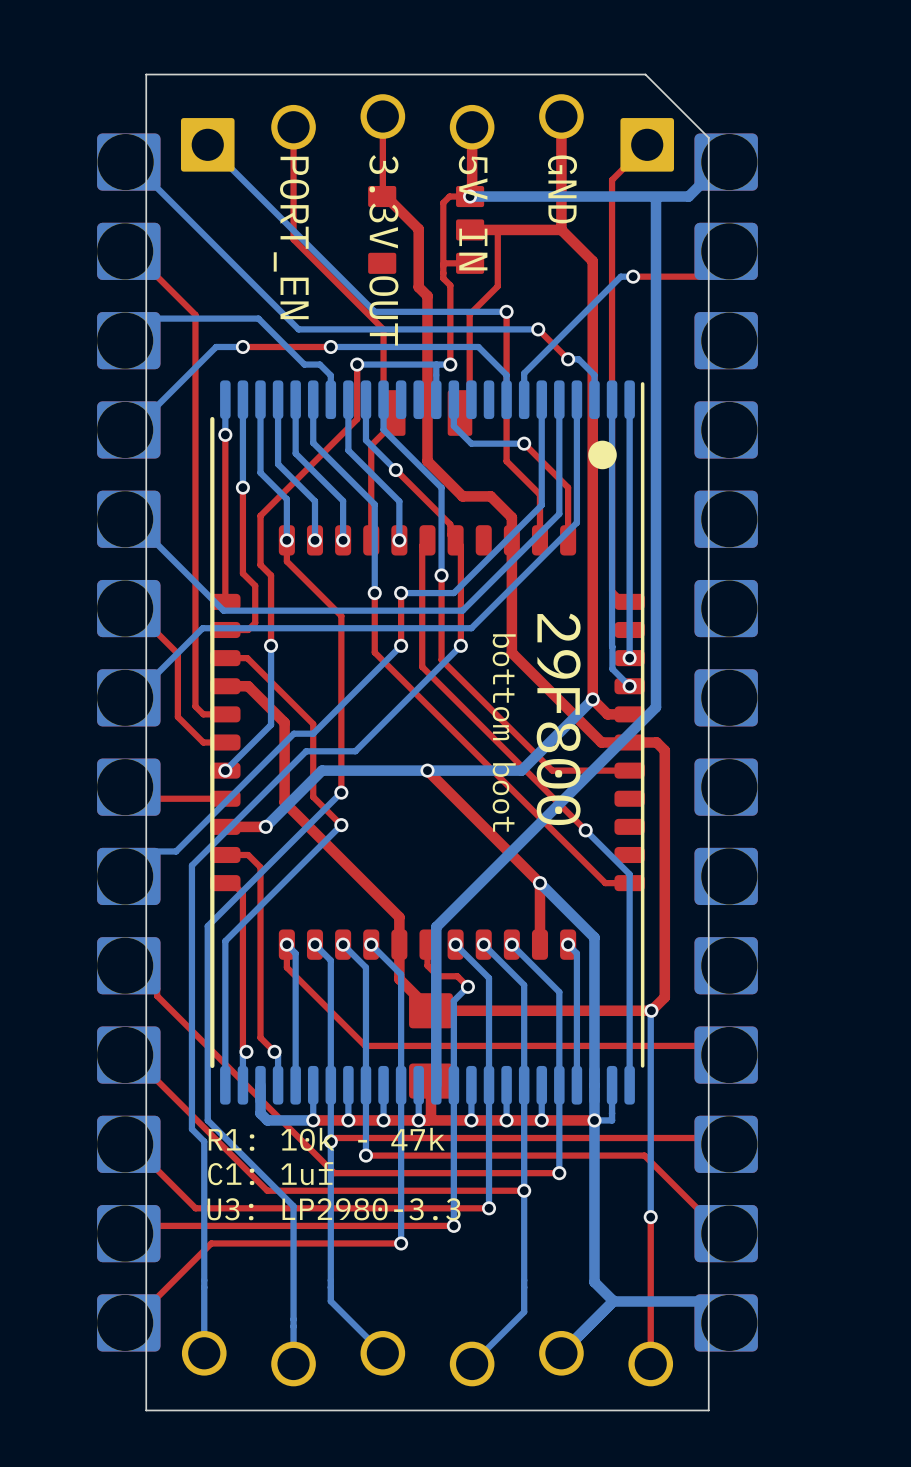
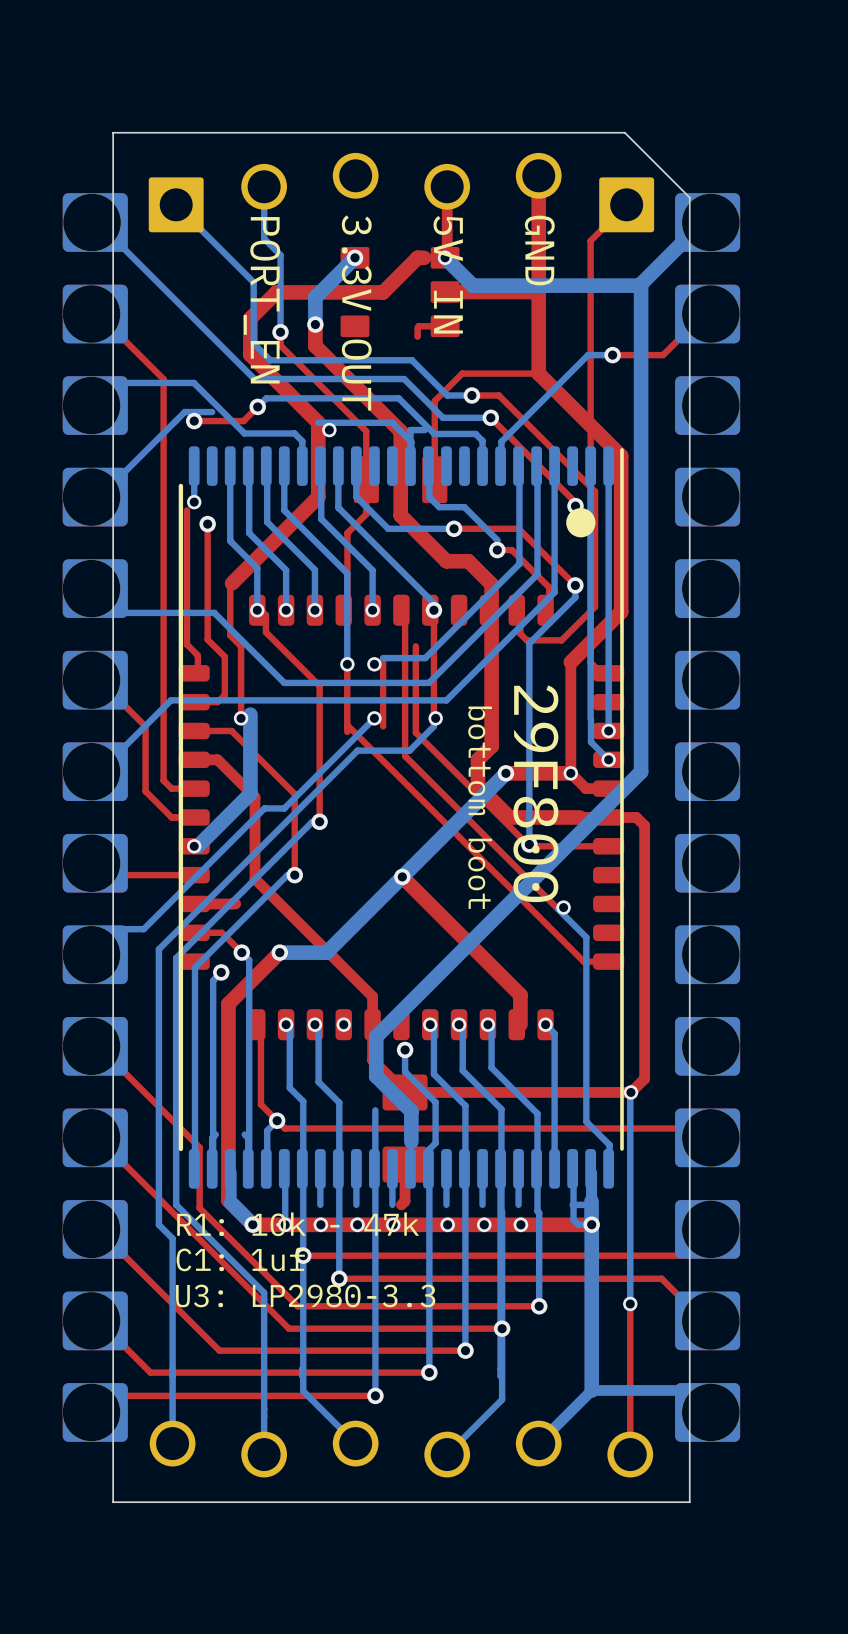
top track: (382, 116) (382, 196) (386, 196) (418, 229) (418, 287) (427, 296) (427, 461) (462, 496) (490, 496) (511, 517) (511, 652) (601, 742) -> (315, 324) (315, 346) (400, 431) (400, 515) (446, 561) (468, 561) (491, 584) (491, 746) (478, 759) (478, 785) (509, 817) (579, 817)
top track width: thin (561, 116) (561, 229) (470, 229) (497, 229) -> thick (538, 175) (538, 292) (445, 292) (473, 292)
bottom track: none -> (264, 185) (264, 238) (280, 255) (280, 332)
top track: (293, 127) (293, 239) (383, 329) (383, 403) (393, 412) -> (280, 332) (280, 345) (366, 431) (366, 479)
bottom track: (723, 162) (688, 196) (470, 196) -> (641, 285) (472, 285) (445, 257)
bottom track: none -> (704, 222) (641, 284) (641, 771) (376, 1036) (376, 1076) (411, 1111) (411, 1141)
bottom track: none -> (355, 257) (315, 297) (315, 324)
via: none -> (355, 257)
top track: (449, 196) (443, 202) (443, 266) -> (424, 257) (417, 257) (383, 292) (276, 292) (250, 318) (250, 354) (318, 422) (318, 497)
bottom track: (656, 197) (656, 707) (436, 927) (436, 1085) -> none
bottom track: (283, 220) (374, 311) (506, 311) -> (253, 282) (253, 343) (270, 360) (411, 360) (447, 395) (471, 395)
top track: (497, 229) (497, 286) (469, 314) (469, 403) (460, 412) -> (538, 373) (462, 373) (434, 401) (434, 479)
top track: (561, 229) (592, 261) (592, 591) -> (538, 373) (621, 456) (621, 611) (570, 662)
top track: none -> (538, 292) (538, 373)
top track: (729, 251) (704, 276) (633, 276) -> (711, 314) (704, 314) (663, 355) (612, 355)
via: none -> (315, 324)
via: none -> (280, 332)
top track: (443, 273) (443, 278) (450, 285) (450, 364) -> none
bottom track: (633, 276) (620, 276) (524, 373) (524, 399) -> none
via position: (633, 276) -> (612, 355)
bottom track: none -> (612, 355) (588, 355) (501, 441) (501, 469)
top track: (506, 311) (506, 461) (539, 494) (539, 540) -> none
via: (506, 311) -> none
bottom track: (283, 314) (298, 329) (538, 329) -> (254, 379) (404, 379) (442, 417) (490, 417)
bottom track: (225, 318) (258, 318) (304, 364) (319, 364) (323, 367) -> (193, 382) (244, 433) (294, 433)
top track: (538, 329) (568, 359) -> none
via: (538, 329) -> none
top track: none -> (471, 395) (498, 395) (595, 491) (595, 606) (561, 640) (526, 640) (520, 633) (520, 610)
via: none -> (471, 395)
top track: none -> (257, 406) (243, 421) (194, 421)
via: none -> (257, 406)
via: (242, 346) -> none
bottom track: (330, 346) (478, 346) (499, 368) -> (257, 406) (266, 398) (398, 398) (434, 433) (475, 433)
top track: (330, 346) (242, 346) -> none
via: (330, 346) -> none
top track: none -> (490, 417) (575, 502) (575, 506)
via: none -> (490, 417)
via: none -> (194, 421)
bottom track: none -> (318, 422) (392, 422) (411, 441) (411, 469)
bottom track: (568, 359) (578, 359) (594, 375) (594, 399) -> none
via: (568, 359) -> none
top track: (357, 364) (357, 419) (346, 429) -> none
bottom track: (436, 364) (357, 364) -> none
via: (450, 364) -> none
bottom track: (242, 399) (242, 487) -> none
bottom track: (278, 399) (278, 465) -> (249, 482) (249, 533)
bottom track: (295, 399) (296, 454) -> (267, 482) (267, 522)
bottom track: (348, 399) (349, 451) -> (321, 482) (321, 518)
bottom track: (453, 399) (453, 426) (471, 443) (524, 443) -> none
bottom track: (541, 399) (541, 505) (453, 593) (401, 593) -> none
bottom track: (559, 399) (559, 513) (462, 610) (223, 610) (132, 519) (125, 519) -> (537, 482) (537, 574) (428, 682) (284, 682) (214, 612) (115, 612) (91, 588)
bottom track: none -> (429, 469) (429, 497) (439, 507) (464, 507) (497, 539) (497, 550)
bottom track: none -> (519, 482) (519, 563) (425, 658) (383, 658)
top track: (393, 423) (371, 445) (371, 540) -> (366, 490) (366, 514) (347, 533) (347, 610)
top track width: thin (346, 429) (262, 514) -> thick (318, 497) (232, 583)
top track: (225, 434) (225, 601) -> none
via: none -> (575, 506)
top track: none -> (186, 510) (186, 644) (197, 655) (197, 673)
top track: (524, 443) (568, 487) (568, 540) -> none
via: (524, 443) -> none
via: none -> (207, 524)
bottom track: (414, 460) (441, 487) (441, 575) -> (388, 528) (454, 528)
top track: none -> (454, 528) (518, 528) (575, 585)
via: none -> (454, 528)
bottom track: none -> (368, 538) (433, 603) (433, 610)
top track: (395, 470) (450, 524) (450, 535) (460, 545) (460, 645) -> none
via: (395, 470) -> none
top track: none -> (497, 550) (511, 550) (549, 587) (549, 610)
via: none -> (497, 550)
top track: (242, 487) (242, 573) -> (207, 524) (207, 639) (212, 644)
via: (242, 487) -> none
bottom track: none -> (575, 585) (575, 597) (529, 643) (529, 844)
via: none -> (575, 585)
top track: (286, 540) (286, 561) (341, 615) (341, 792) -> none
top track: none -> (260, 610) (265, 615) (265, 632) (319, 685) (319, 821)
top track: (427, 540) (422, 545) (422, 666) (585, 830) -> none
top track: none -> (405, 610) (405, 756) (557, 909)
top track: none -> (433, 610) (433, 726)
via: none -> (433, 610)
via: (441, 575) -> none
top track: none -> (383, 658) (383, 726)
top track: (401, 593) (401, 645) -> none
bottom track: none -> (250, 714) (250, 793) (197, 846)
bottom track: (271, 645) (271, 724) (225, 770) -> none
bottom track: (460, 645) (355, 751) (306, 751) (191, 865) (191, 1129) (204, 1141) (204, 1153) -> (433, 726) (409, 750) (357, 750) (158, 949) (158, 1224) (172, 1238)
top track: (247, 658) (313, 724) (313, 796) (341, 825) -> (216, 730) (231, 730) (294, 794) (294, 875)
bottom track: none -> (505, 773) (326, 952) (279, 952)
via: none -> (505, 773)
bottom track: (592, 699) (521, 770) (322, 770) (265, 826) -> none
top track: none -> (570, 773) (505, 773)
via: none -> (319, 821)
via: none -> (529, 844)
top track: (427, 770) (539, 883) (539, 944) -> none
via: (427, 770) -> none
bottom track: (341, 792) (207, 926) -> (319, 821) (312, 821) (176, 958) (176, 1005)
via: (341, 792) -> none
bottom track: none -> (294, 875) (287, 875) (195, 967) (195, 1170)
via: none -> (294, 875)
top track: none -> (402, 876) (520, 995) (520, 1024)
via: none -> (402, 876)
bottom track: (341, 825) (225, 941) (225, 1085) -> none
via: (341, 825) -> none
via: (265, 826) -> none
bottom track: (585, 830) (629, 874) (629, 1088) -> (557, 909) (586, 937) (586, 1121) (609, 1144) (609, 1172)
top track: (248, 854) (260, 867) (260, 1037) (274, 1051) -> (217, 932) (221, 932) (241, 952)
bottom track: none -> (241, 952) (249, 960) (249, 1172)
via: none -> (241, 952)
top track: none -> (279, 952) (228, 1003) (228, 1200) (252, 1224) (591, 1224)
via: none -> (279, 952)
top track: (225, 883) (232, 883) (242, 893) (242, 1048) (246, 1051) -> none
bottom track: (539, 883) (594, 937) (594, 1282) (612, 1299) (612, 1302) -> none
via: (539, 883) -> none
bottom track: none -> (221, 972) (213, 980) (213, 1172)
via: none -> (221, 972)
bottom track: (286, 944) (295, 953) (295, 1087) -> none
top track: (286, 944) (286, 967) (365, 1045) -> (260, 1024) (260, 1104) (284, 1128) (337, 1128)
via: (286, 944) -> none
bottom track: (314, 944) (330, 960) (330, 1280) -> none
bottom track: (343, 944) (365, 967) (365, 1155) -> none
bottom track: none -> (318, 1024) (318, 1082) (339, 1102) (339, 1278)
bottom track: (371, 944) (401, 974) (401, 1243) -> none
top track: (427, 944) (427, 965) (438, 976) (457, 976) (467, 986) -> none
bottom track: (455, 944) (489, 978) (489, 1208) -> none
bottom track: none -> (433, 1024) (433, 1074) (465, 1105) (465, 1350)
bottom track: (483, 944) (524, 985) (524, 1087) -> none
bottom track: (511, 944) (559, 992) (559, 1173) -> none
bottom track: none -> (491, 1024) (491, 1067) (537, 1113) (539, 1306)
top track: (131, 965) (134, 965) (157, 988) (157, 995) (334, 1173) (559, 1173) -> (98, 1046) (199, 1147) (199, 1208) (297, 1306) (539, 1306)
bottom track: none -> (405, 1049) (405, 1071) (435, 1102) (435, 1143) (429, 1149) (429, 1372)
via: none -> (405, 1049)
bottom track: (467, 986) (453, 1000) (453, 1225) -> none
via: (467, 986) -> none
bottom track: none -> (375, 1110) (375, 1395)
bottom track: none -> (277, 1120) (267, 1130) (267, 1172)
via: none -> (277, 1120)
via: (246, 1051) -> none
via: (274, 1051) -> none
bottom track: (260, 1085) (260, 1113) (267, 1120) (313, 1120) (313, 1088) -> (285, 1224) (285, 1172)
bottom track: none -> (231, 1172) (231, 1203) (252, 1224)
bottom track: none -> (573, 1172) (573, 1219) (578, 1224) (591, 1224)
via: (313, 1120) -> none
via: (348, 1120) -> none
via: (383, 1120) -> none
via: (418, 1120) -> none
via: (471, 1120) -> none
via: (506, 1120) -> none
via: (541, 1120) -> none
top track: (594, 1120) (313, 1120) -> none
via: (594, 1120) -> none
via: none -> (252, 1224)
via: none -> (285, 1224)
via: none -> (320, 1224)
via: none -> (357, 1224)
via: none -> (393, 1224)
via: none -> (447, 1224)
via: none -> (484, 1224)
via: none -> (520, 1224)
via: none -> (591, 1224)
top track: (330, 1141) (334, 1138) (723, 1138) (729, 1144) -> (303, 1255) (685, 1255) (711, 1229)
via: (330, 1141) -> none
top track: (365, 1155) (644, 1155) (681, 1192) -> (339, 1278) (661, 1278)
via: (365, 1155) -> none
via: none -> (303, 1255)
via: (559, 1173) -> none
top track: (524, 1190) (267, 1190) -> (502, 1328) (289, 1328) (237, 1276)
via: (524, 1190) -> none
via: none -> (339, 1278)
top track: (489, 1208) (195, 1208) -> (465, 1350) (219, 1350) (163, 1294)
via: (489, 1208) -> none
via: none -> (539, 1306)
top track: (453, 1225) (140, 1225) (132, 1233) -> (429, 1372) (150, 1372) (98, 1320)
via: (453, 1225) -> none
via: none -> (502, 1328)
top track: (401, 1243) (211, 1243) (131, 1322) (125, 1322) -> (375, 1395) (108, 1395) (91, 1412)
via: (401, 1243) -> none
via: none -> (465, 1350)
via: none -> (429, 1372)
bottom track: (330, 1287) (331, 1302) -> (289, 1024) (289, 1087) (303, 1101) (303, 1391)
bottom track: (524, 1287) (524, 1311) -> (462, 1024) (462, 1070) (501, 1109) (502, 1399) (500, 1401)
via: none -> (375, 1395)

